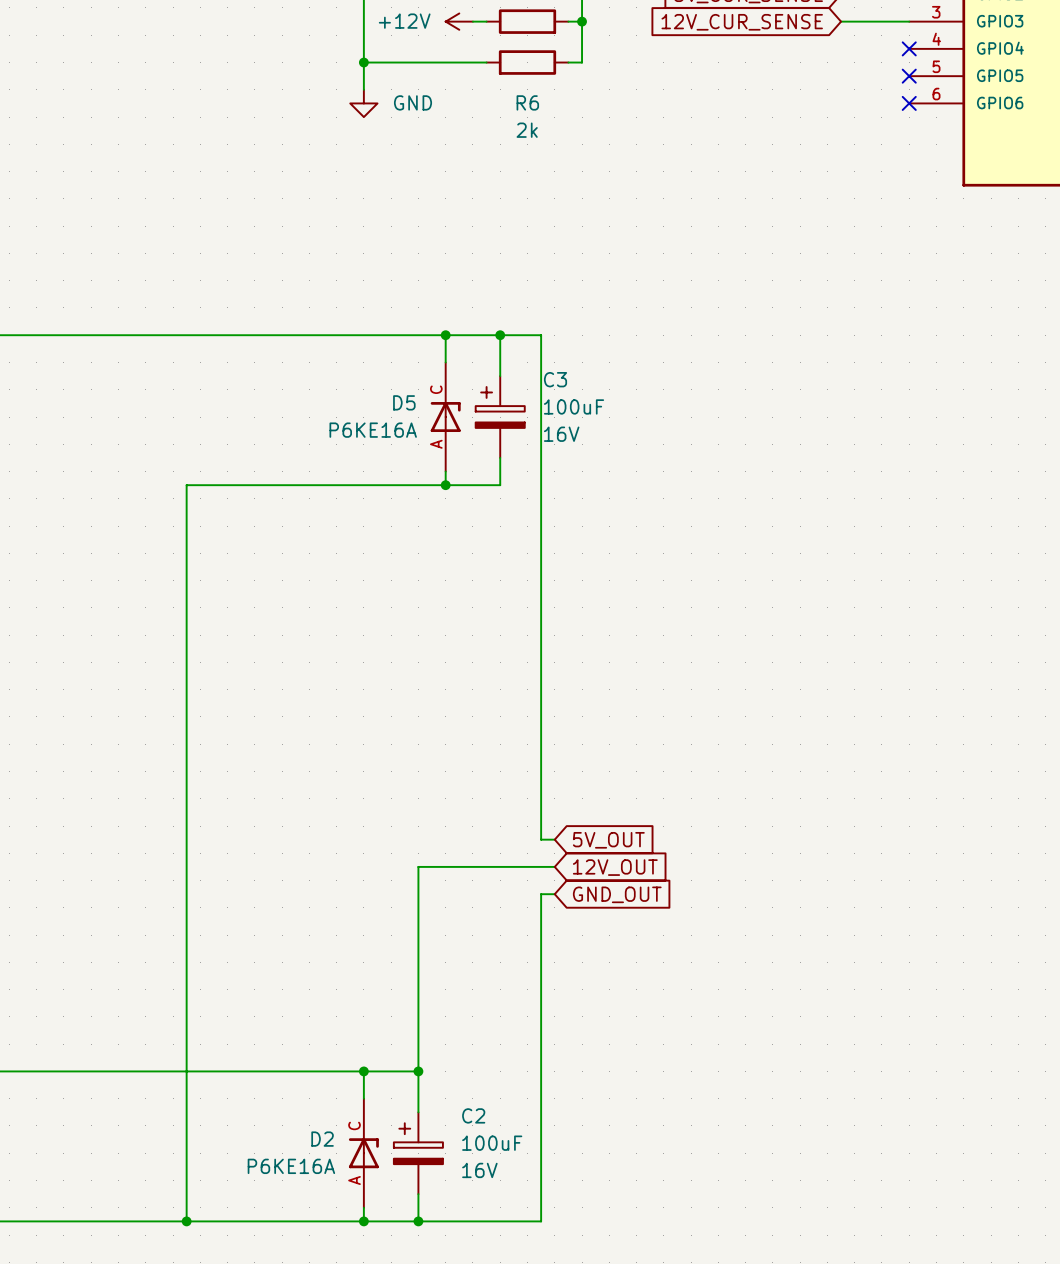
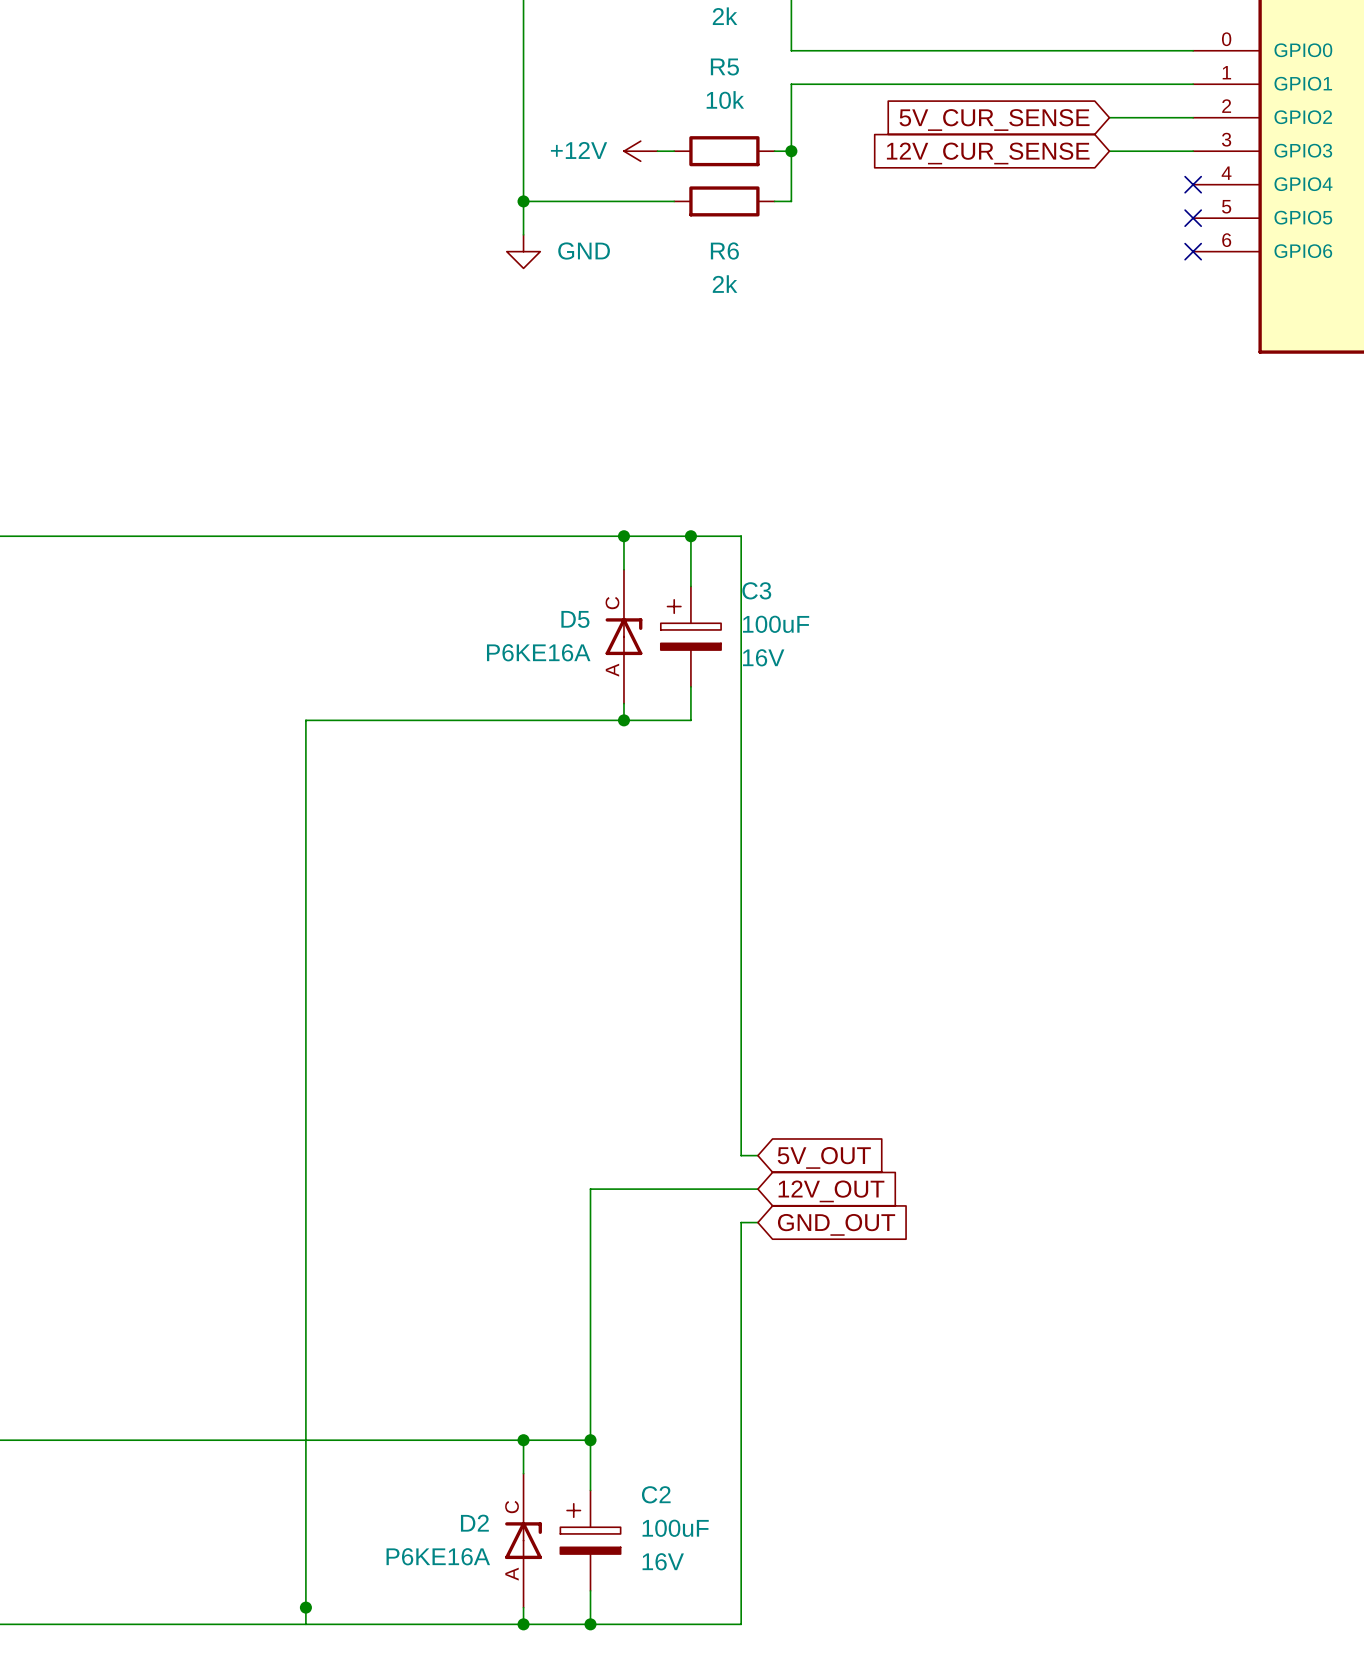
junction position: (186, 1221) -> (305, 1607)

